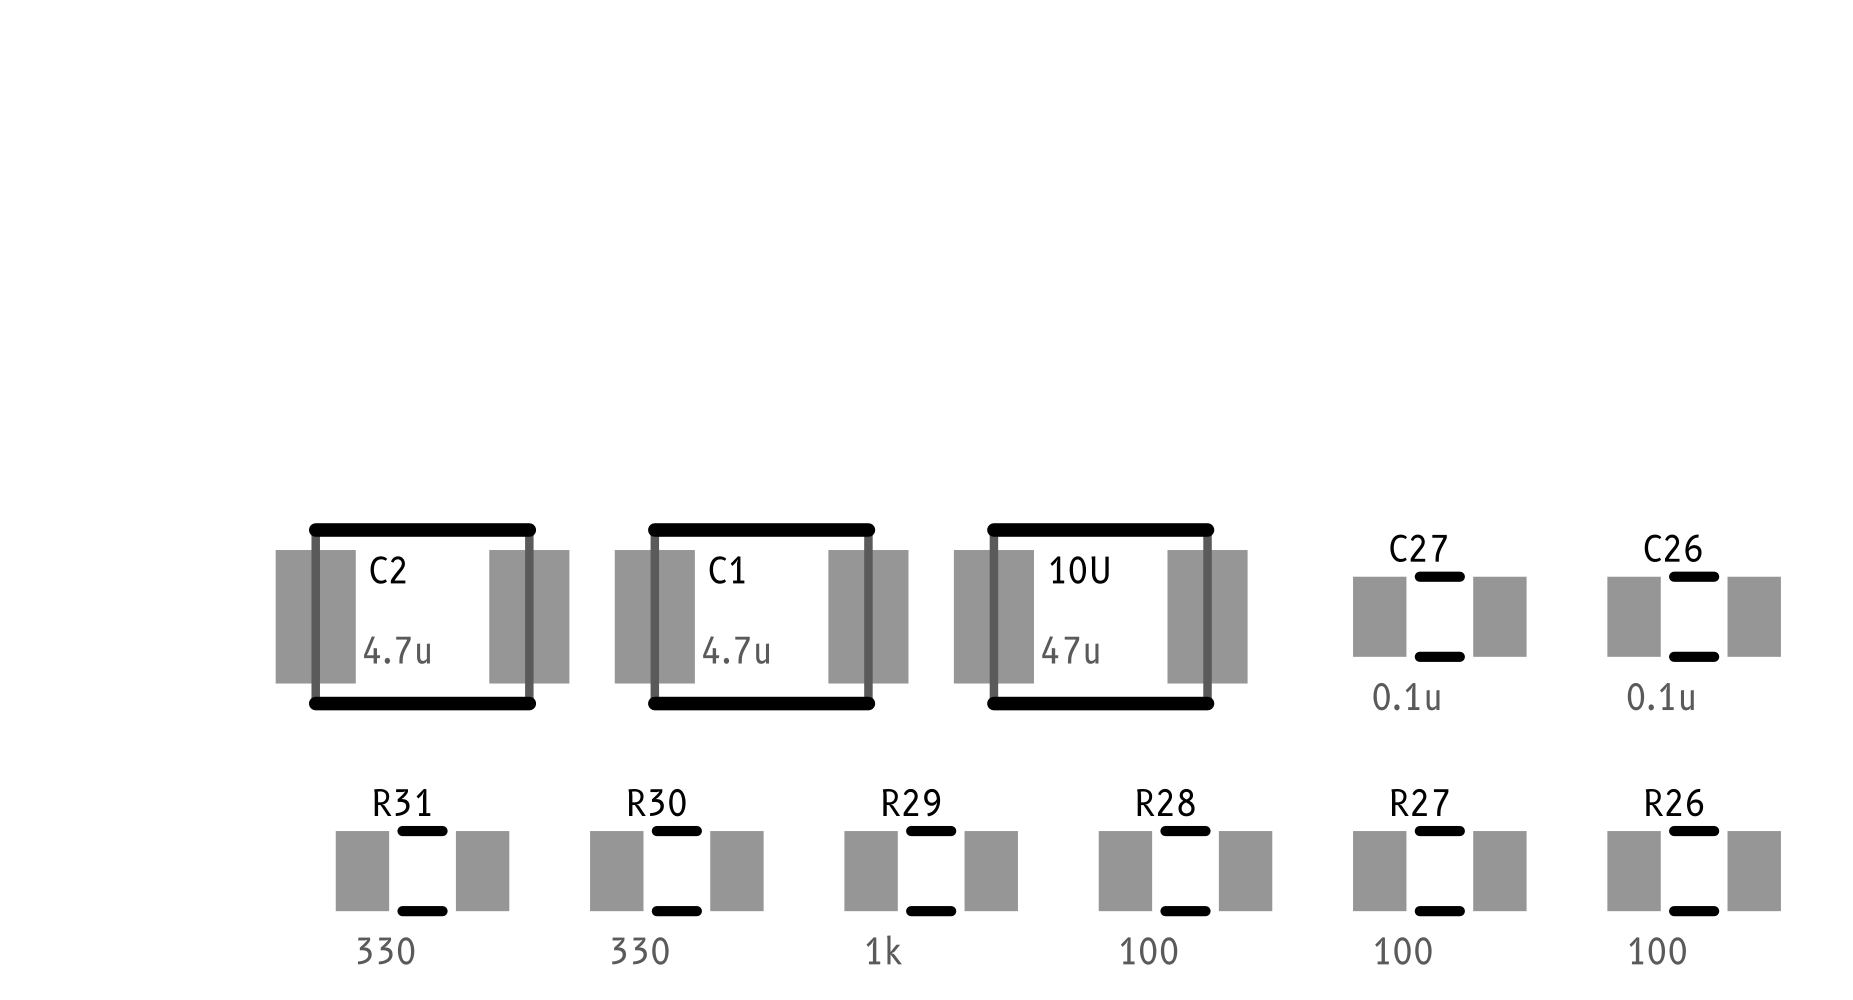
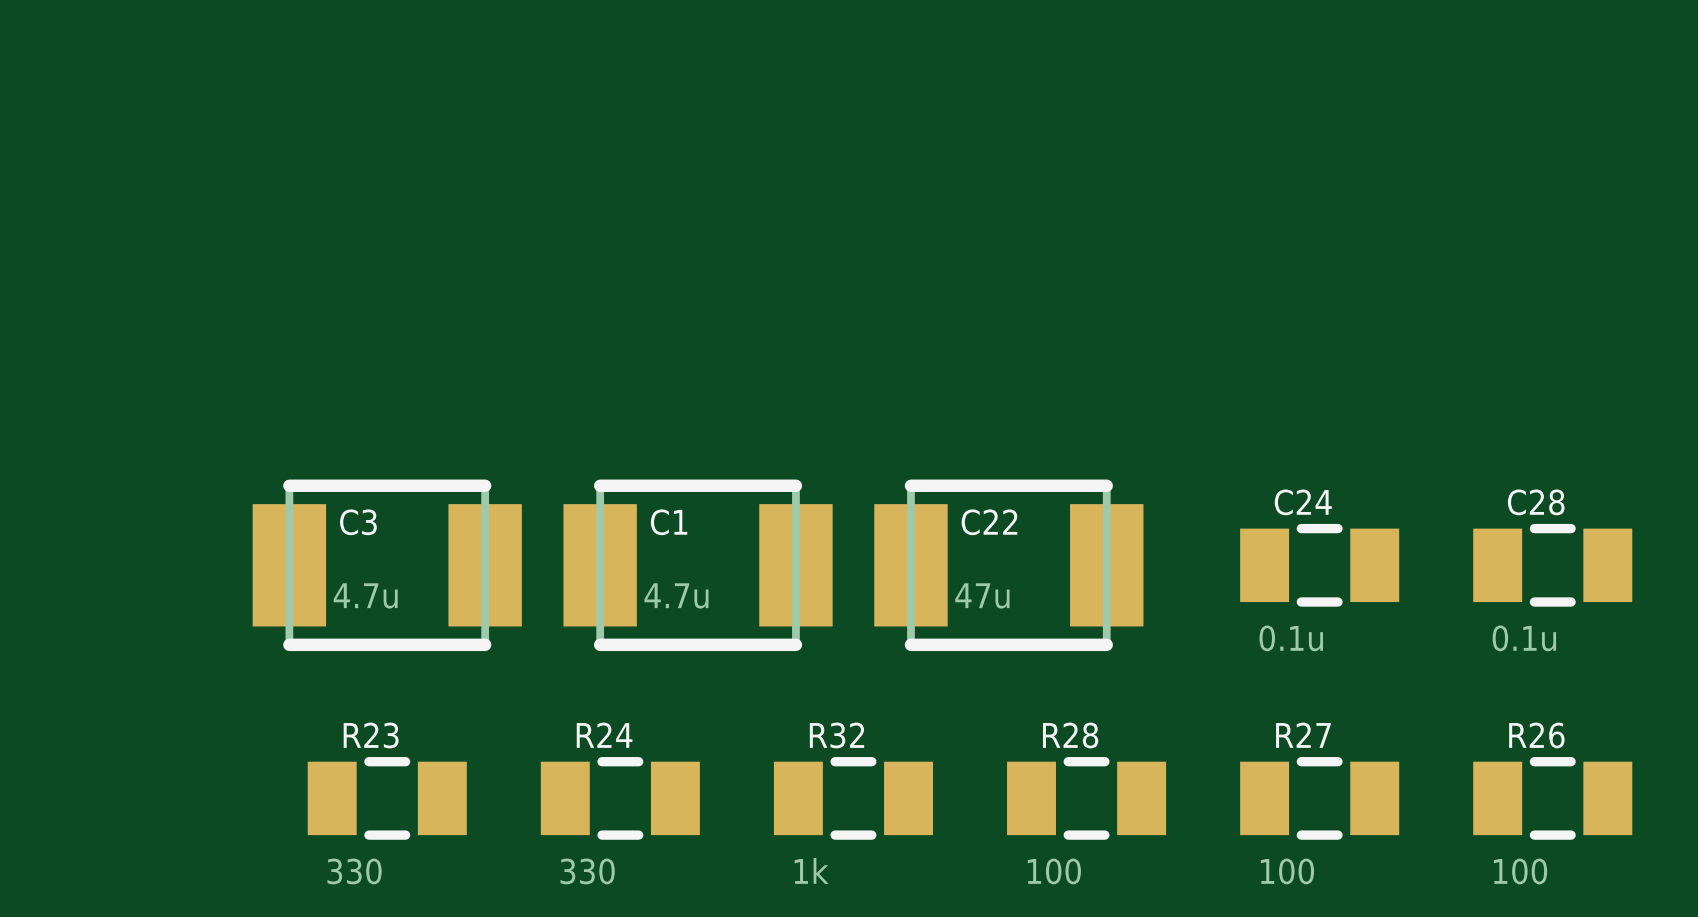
C27 name: C27 (1418, 548) -> C24 (1303, 502)
C26 name: C26 (1673, 548) -> C28 (1536, 502)
10U name: 10U (1079, 569) -> C22 (989, 522)
C2 name: C2 (387, 570) -> C3 (358, 522)
R31 name: R31 (402, 802) -> R23 (371, 735)
R30 name: R30 (657, 802) -> R24 (604, 735)
R29 name: R29 (911, 802) -> R32 (837, 735)

